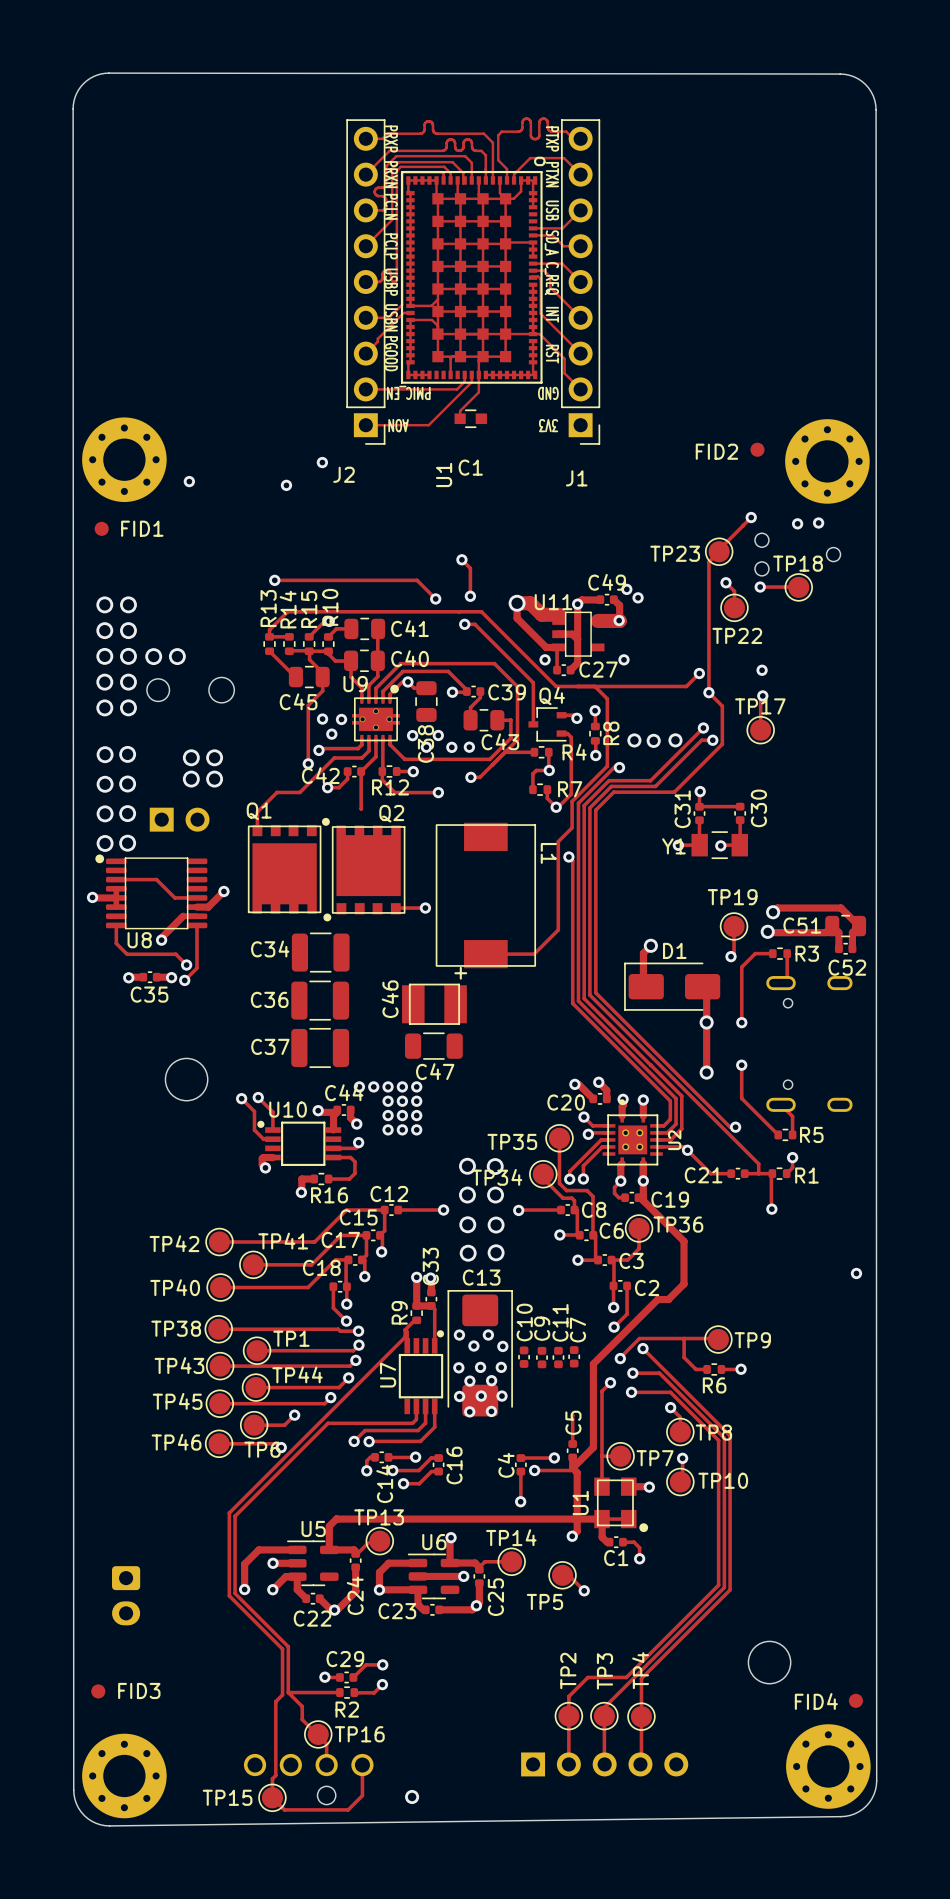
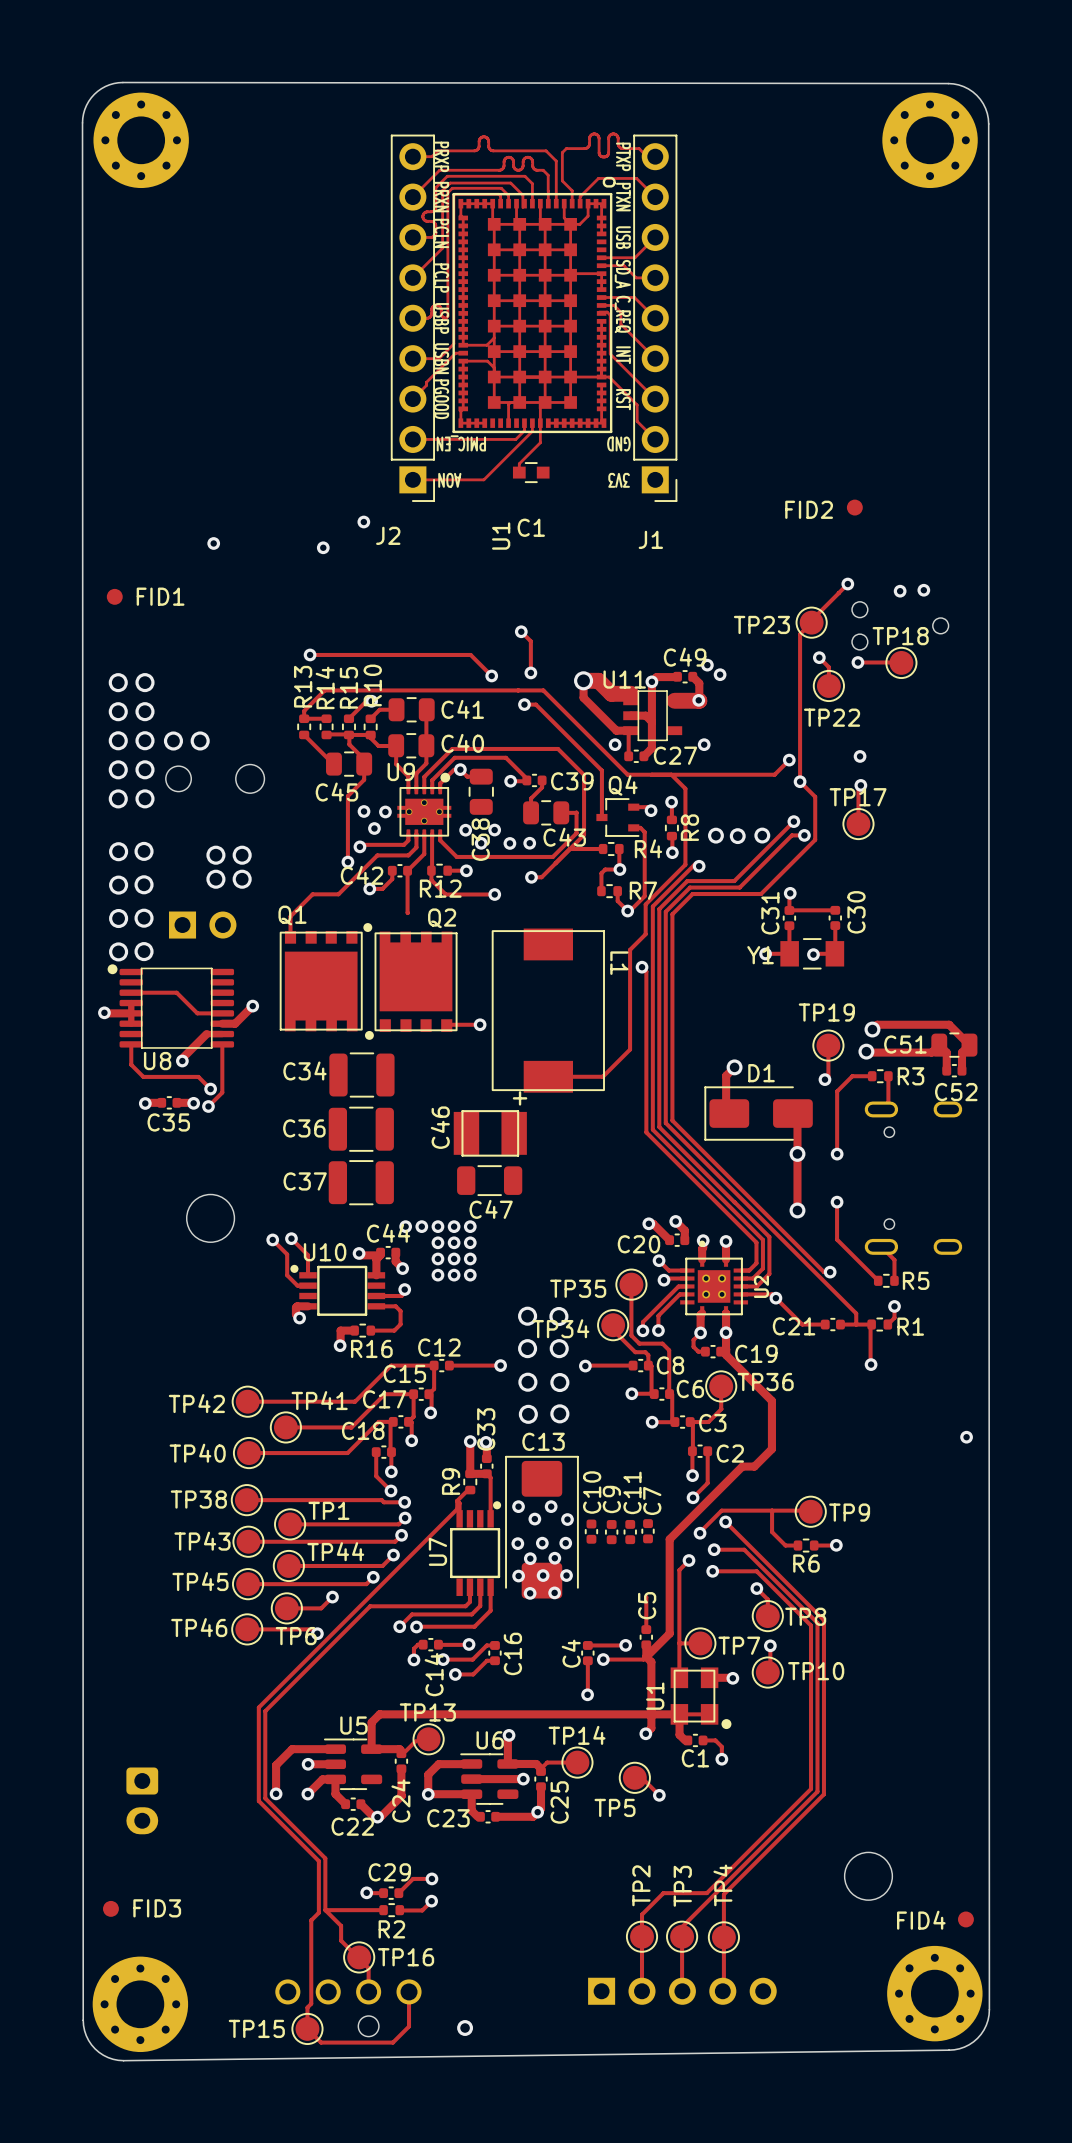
part position: (124, 459) -> (141, 140)
part position: (827, 461) -> (930, 140)

